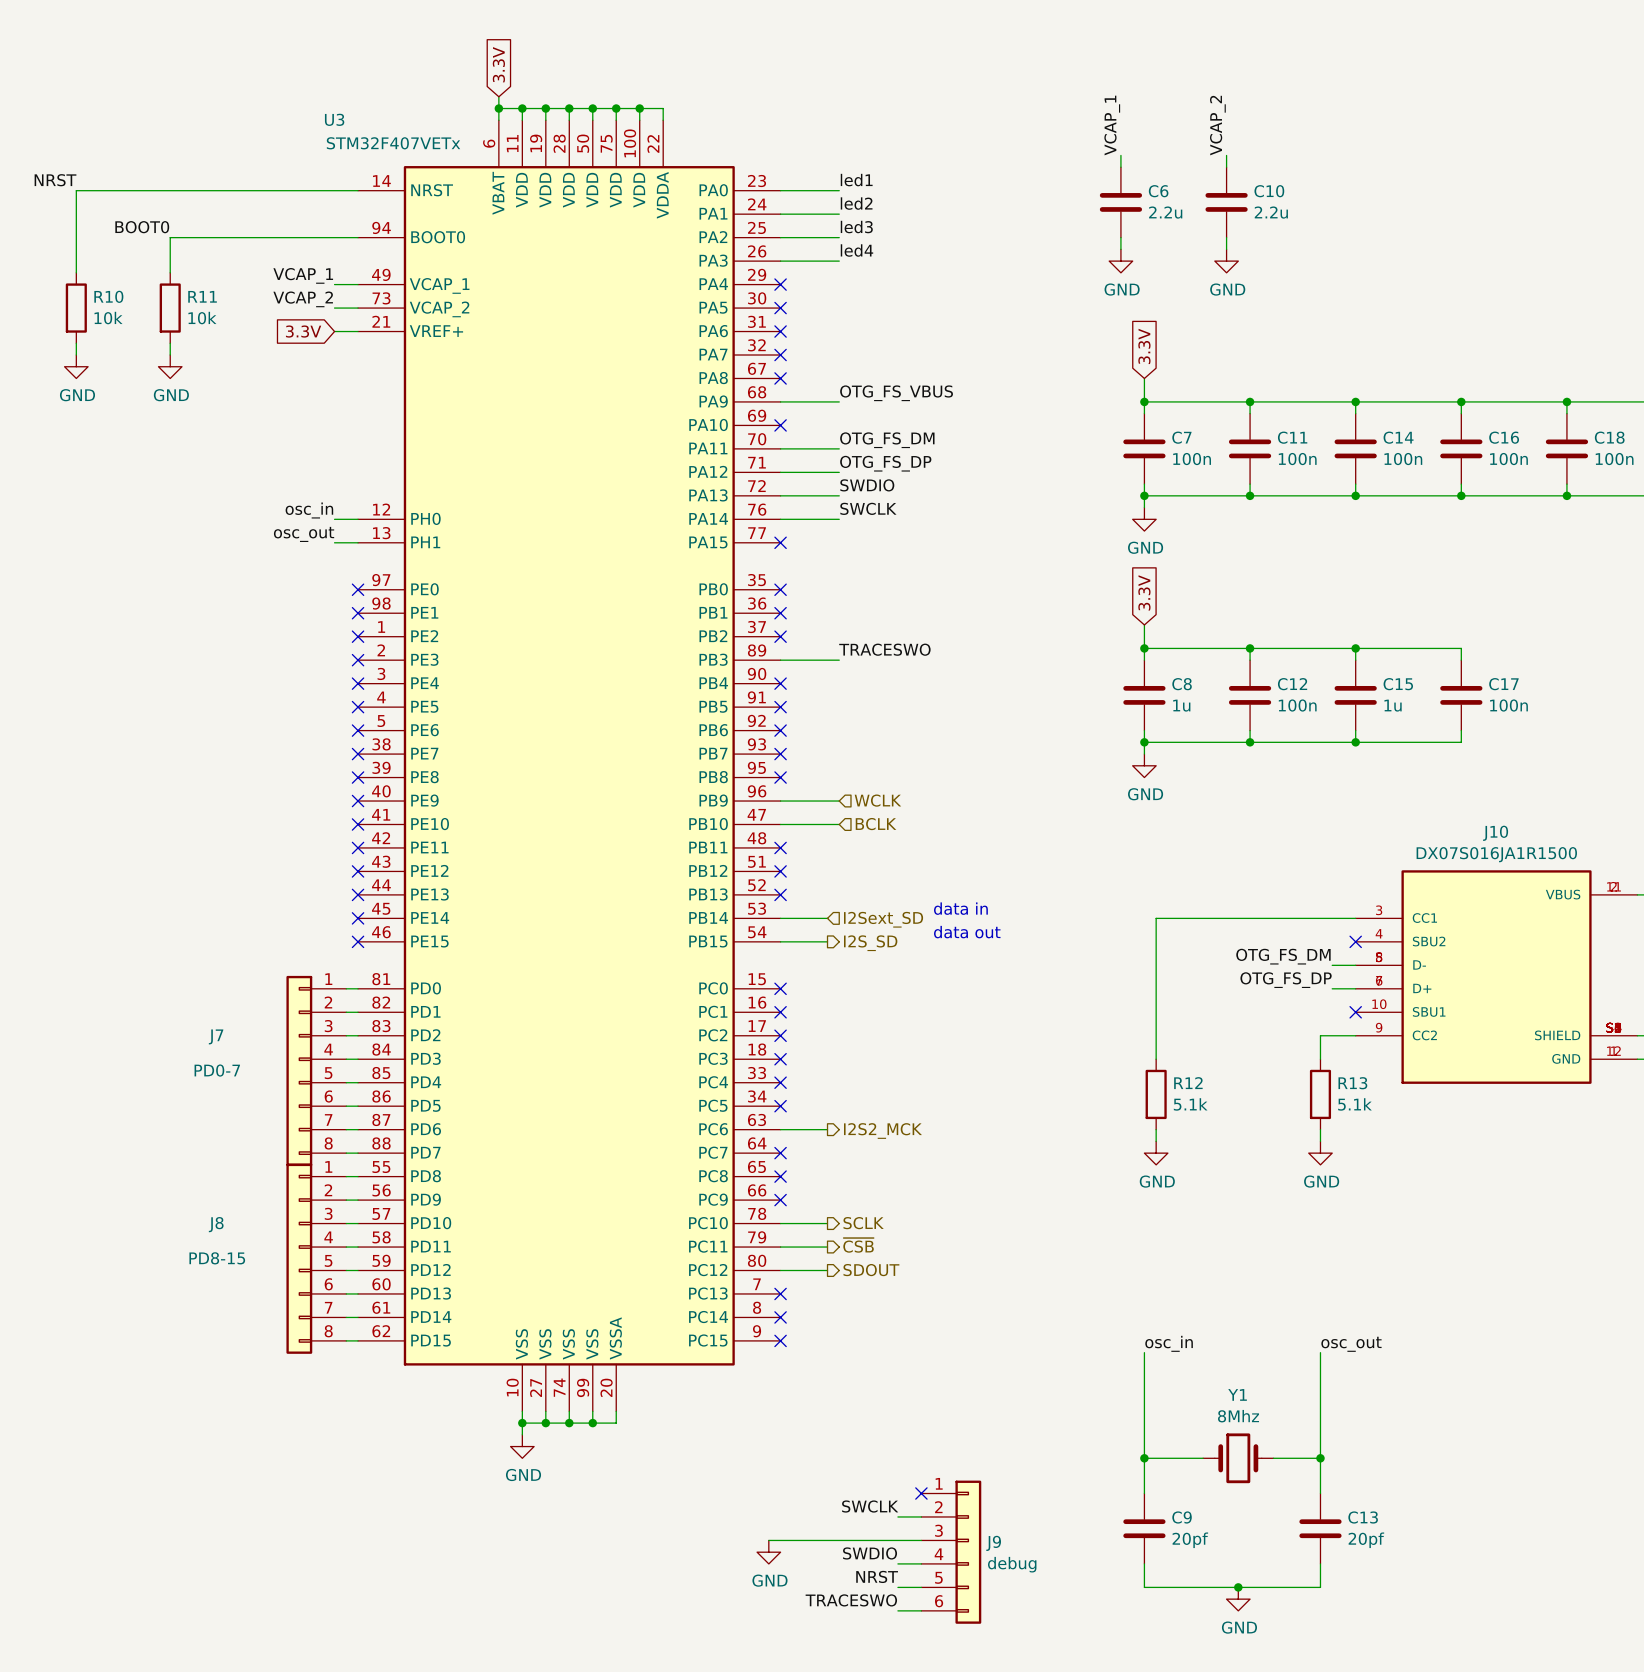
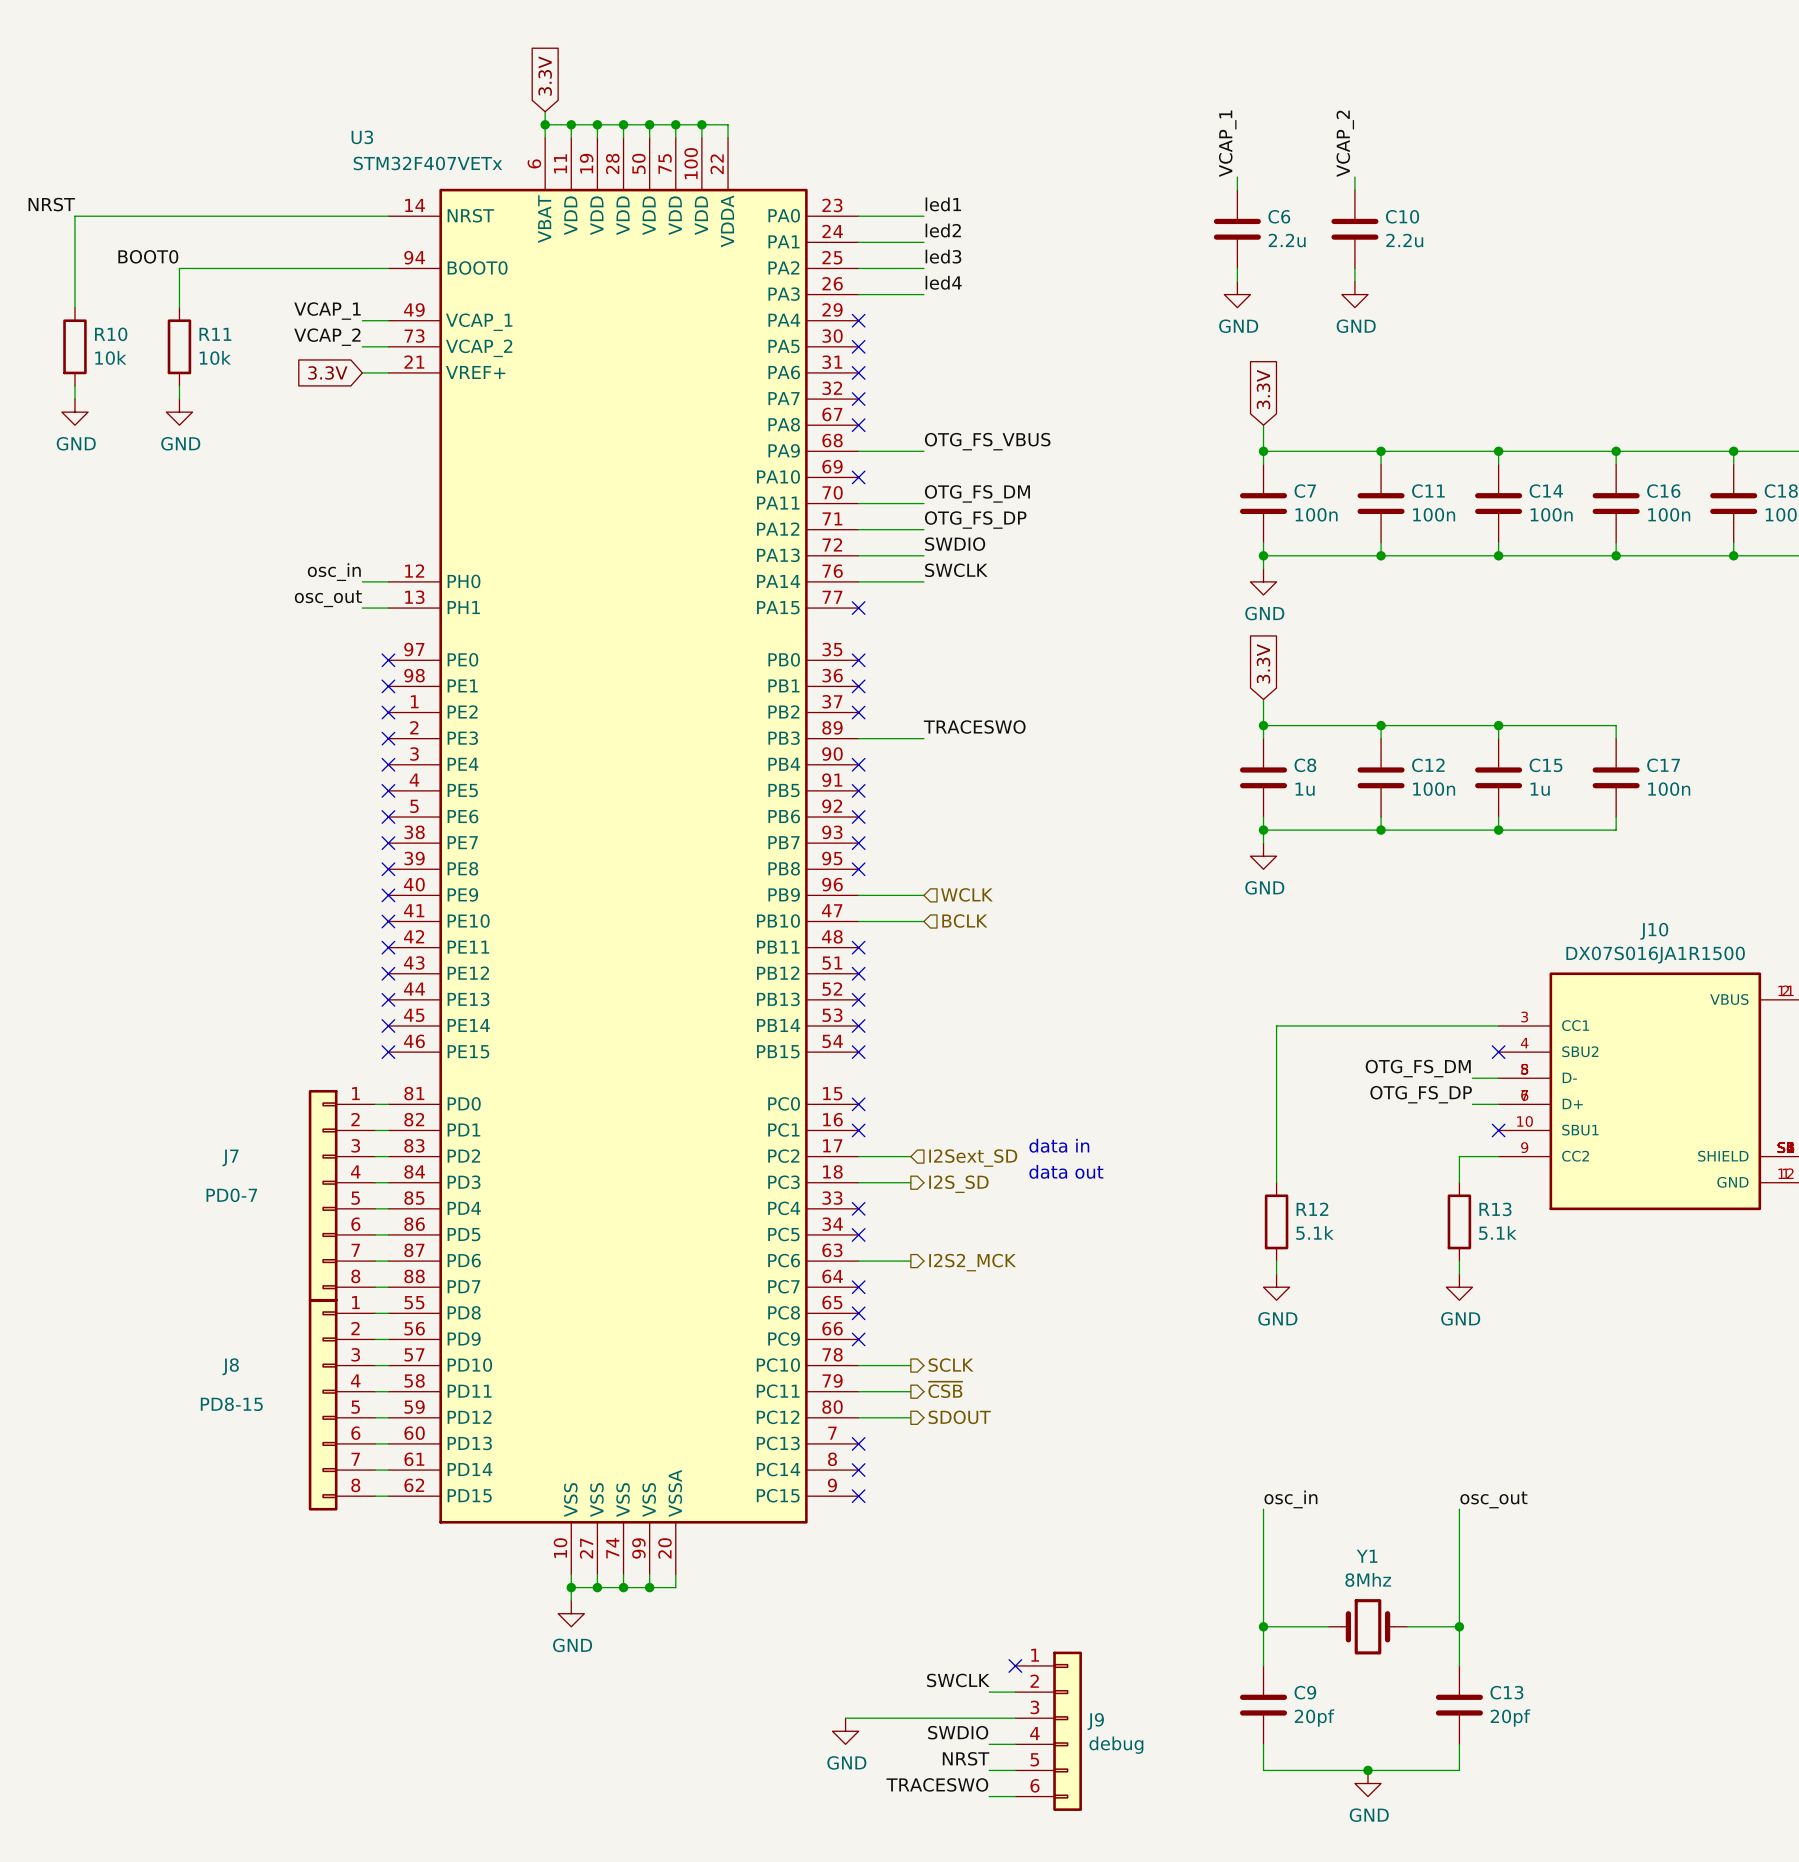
text position: data in (960, 908) -> data in (1059, 1145)
wire: (780, 918) (827, 918) -> (858, 1156) (910, 1156)
no-connect mark: none -> (858, 1025)
hierarchical label position: I2Sext_SD (883, 919) -> I2Sext_SD (973, 1158)
text position: data out (967, 932) -> data out (1066, 1171)
wire: (780, 941) (827, 941) -> (858, 1182) (910, 1182)
no-connect mark: none -> (858, 1052)
hierarchical label position: I2S_SD (870, 943) -> I2S_SD (958, 1184)
no-connect mark: (780, 1035) -> none
no-connect mark: (780, 1059) -> none

